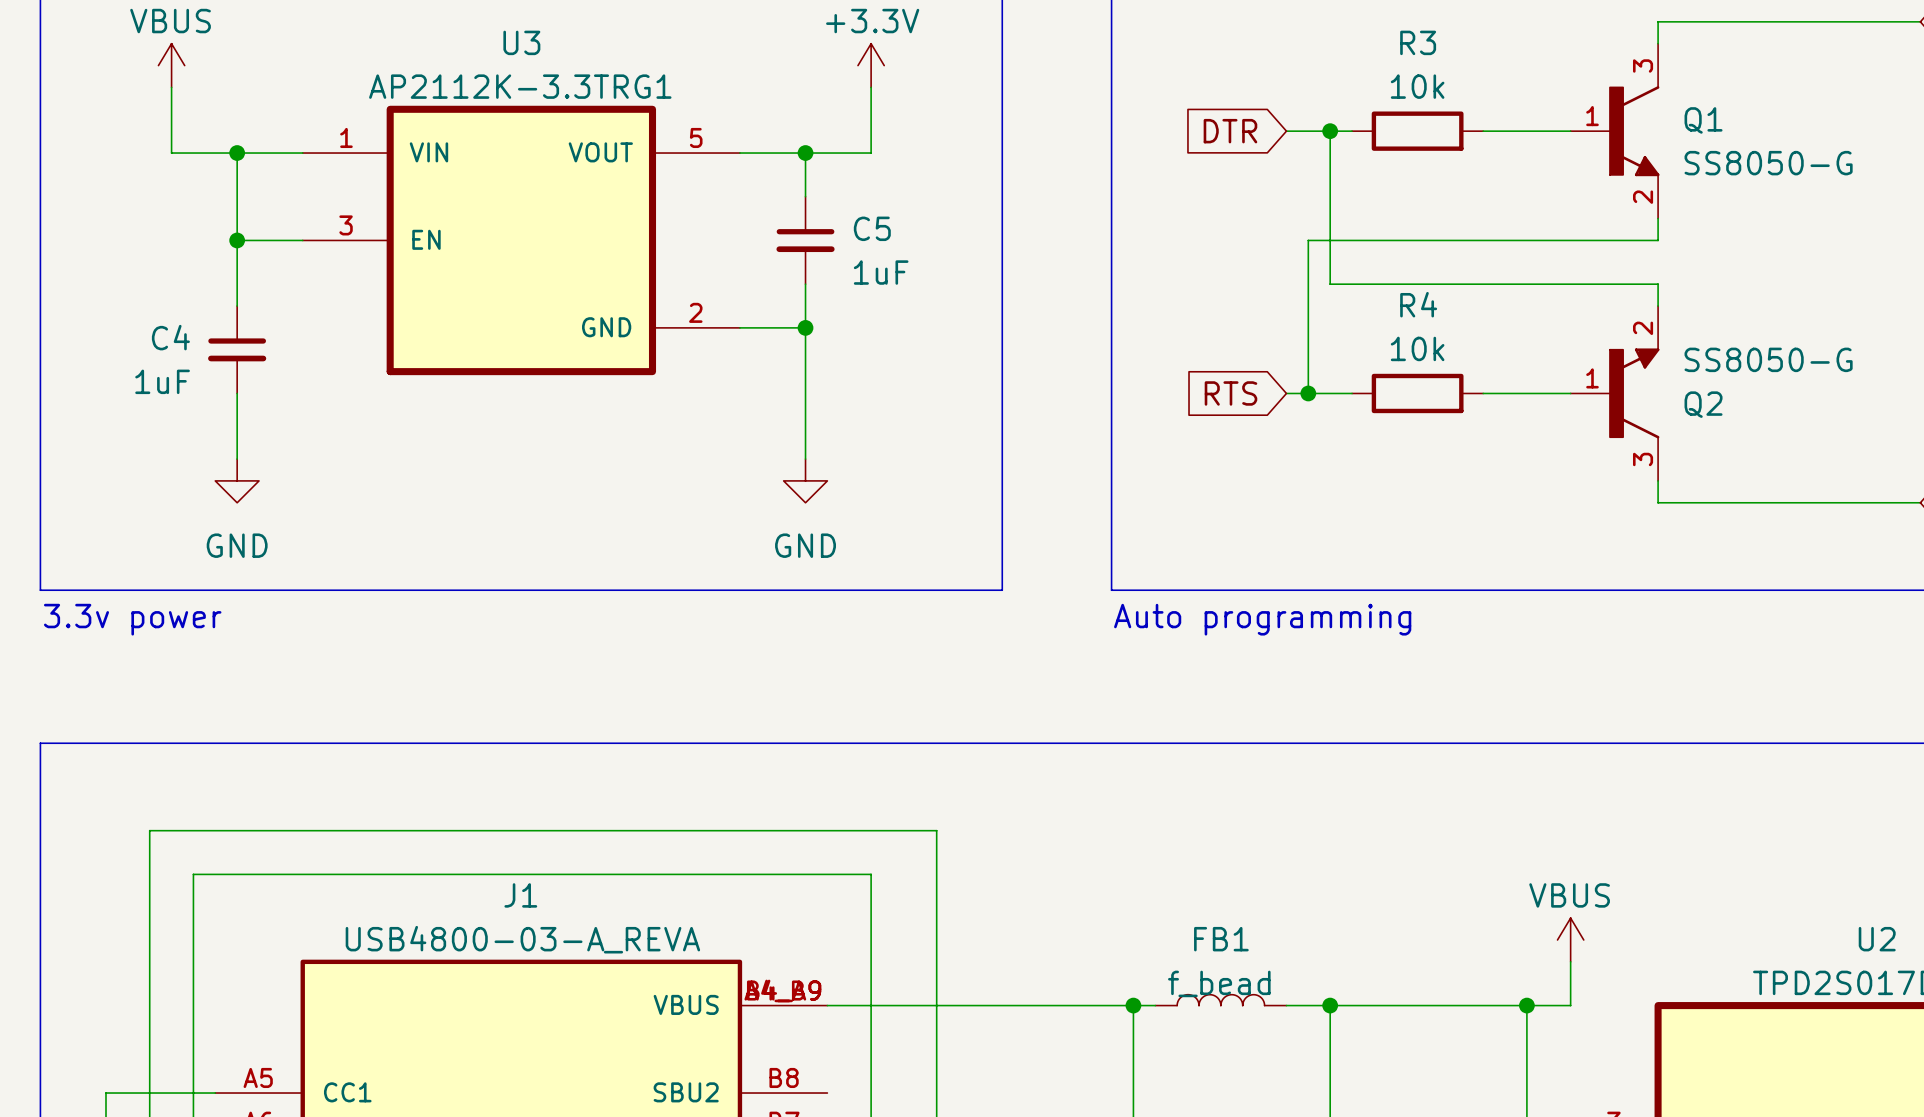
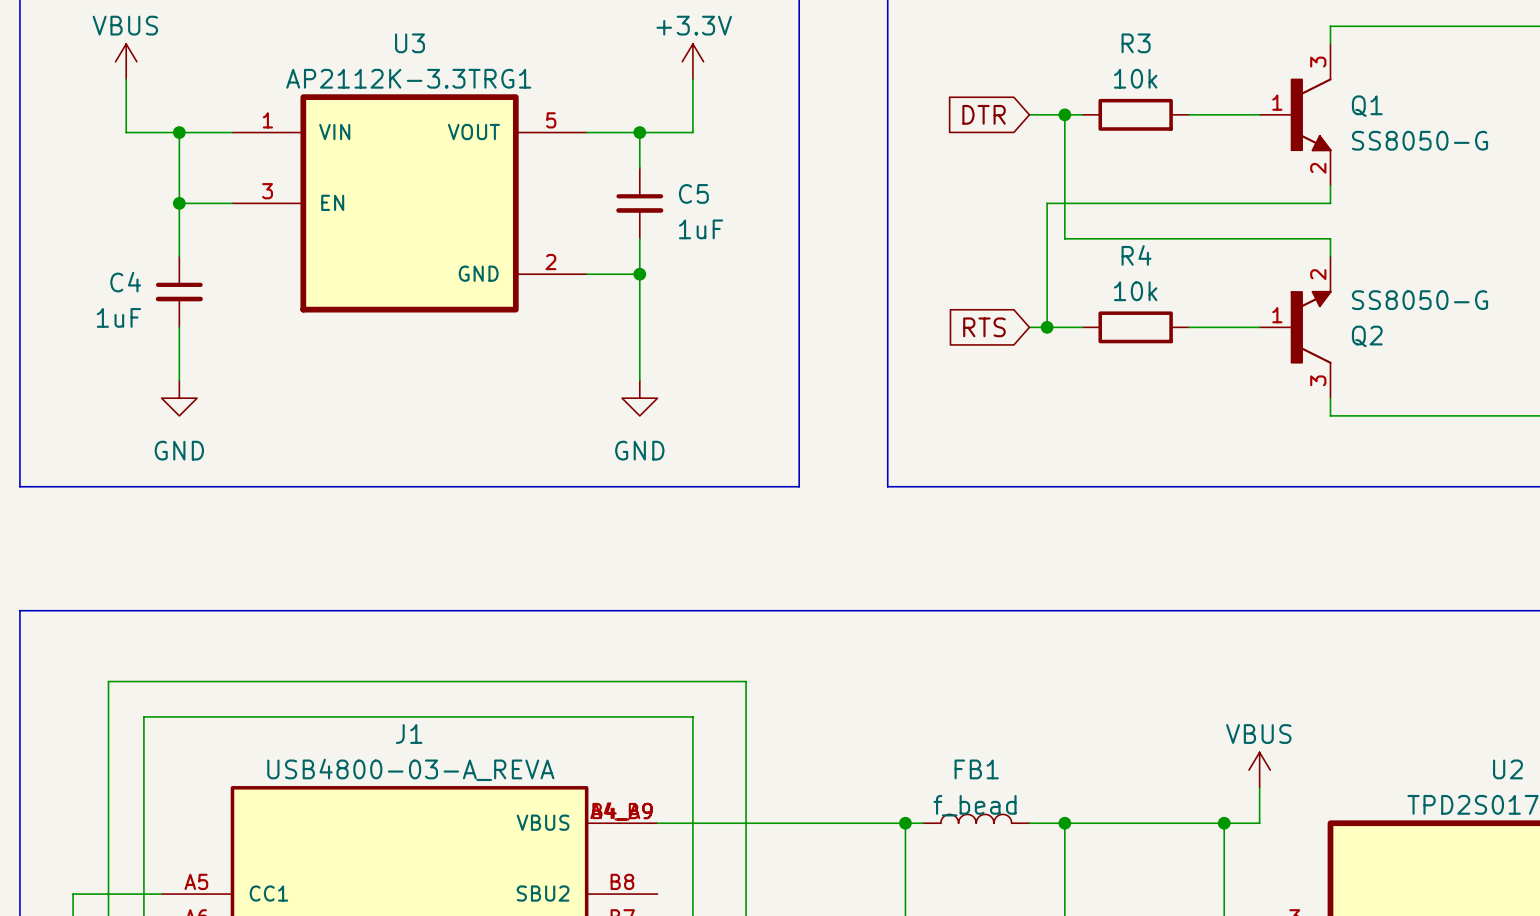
text: 3.3v power (132, 619) -> none
text: Auto programming (1262, 619) -> none

